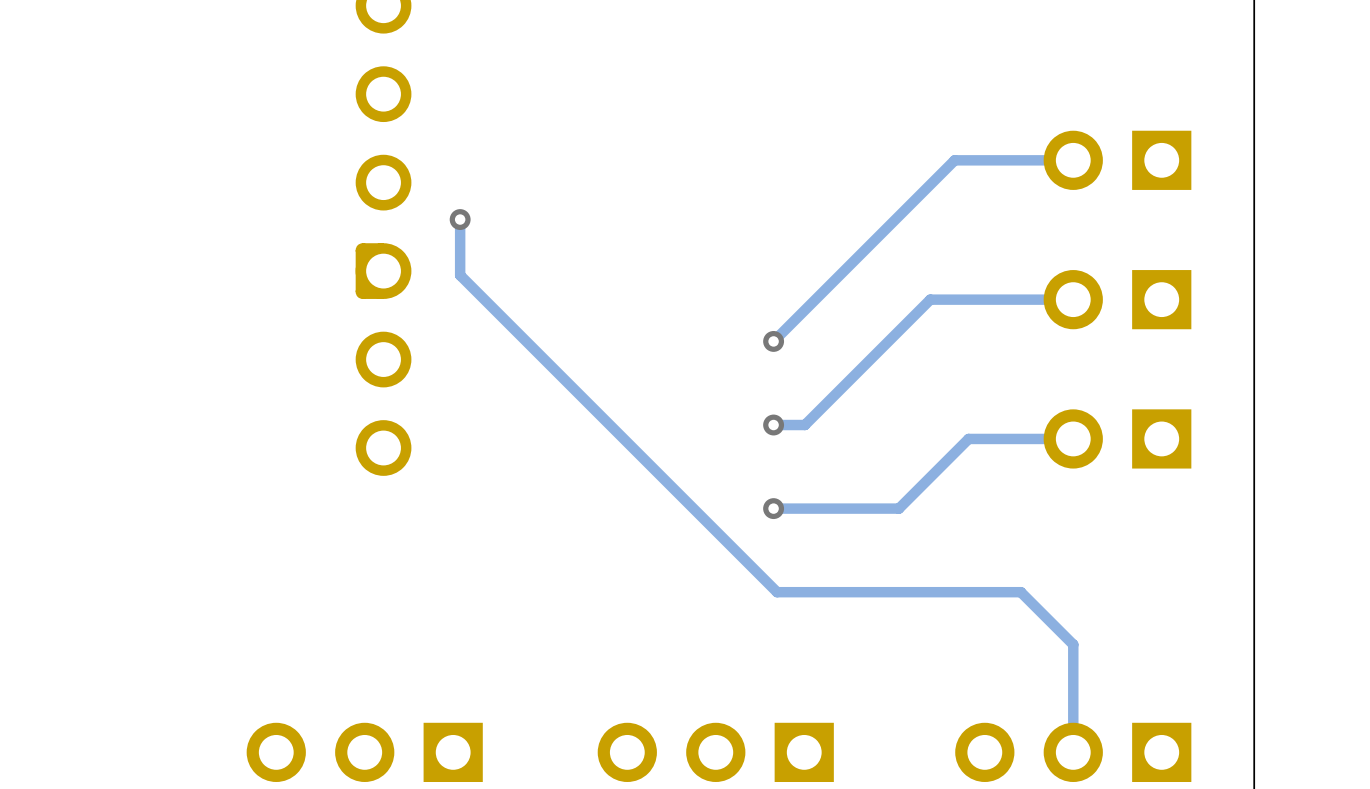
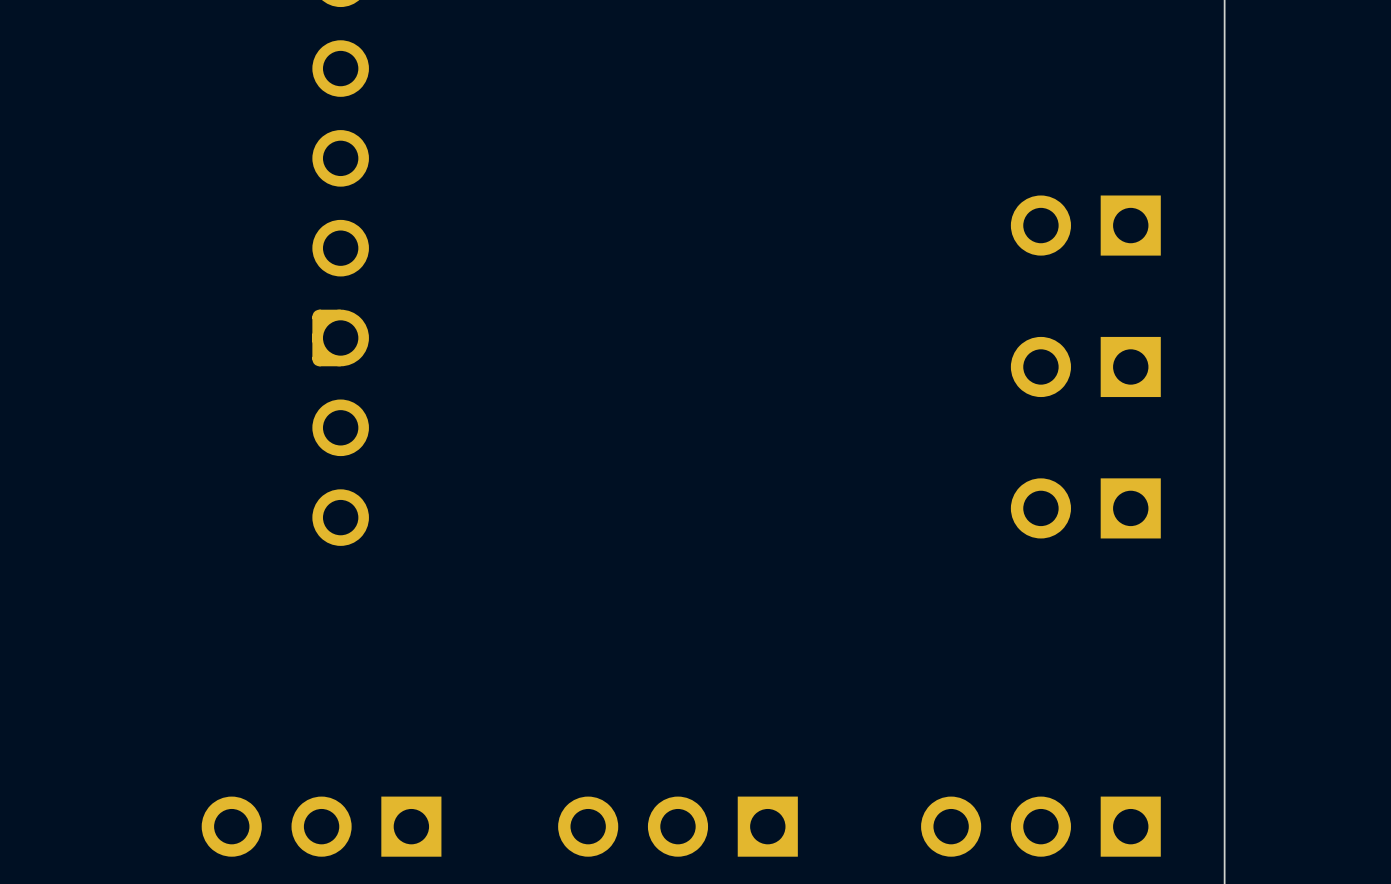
track: (1073, 160) (954, 160) (773, 341) -> none
track: (460, 219) (460, 275) (777, 592) (1020, 592) (1073, 644) (1073, 752) -> none
via: (460, 219) -> none
track: (1073, 299) (930, 299) (804, 425) (773, 425) -> none
via: (773, 341) -> none
via: (773, 425) -> none
track: (1073, 438) (968, 438) (898, 508) (773, 508) -> none
via: (773, 508) -> none

